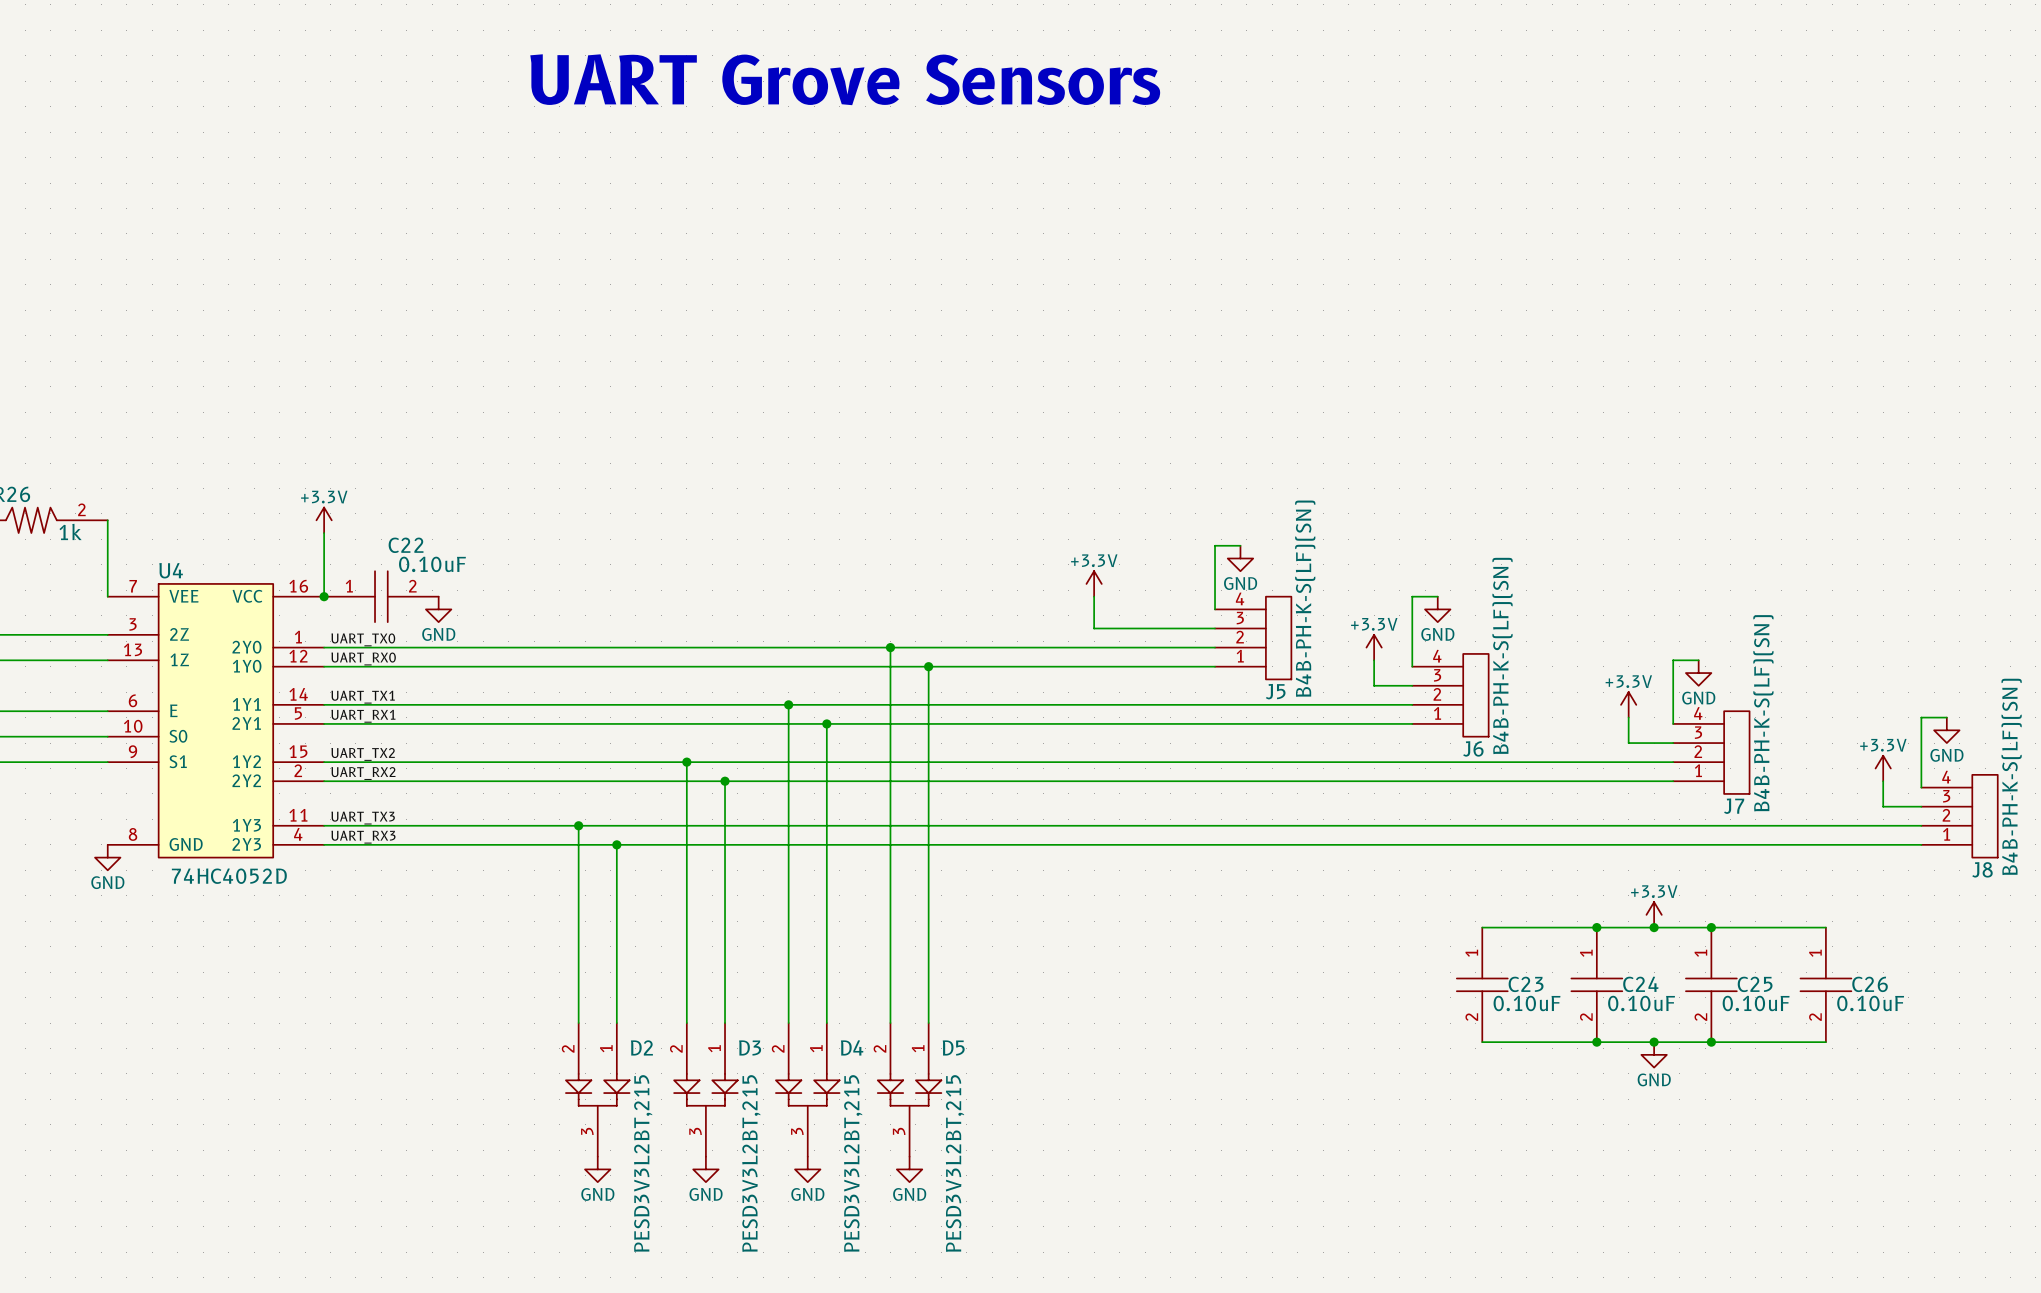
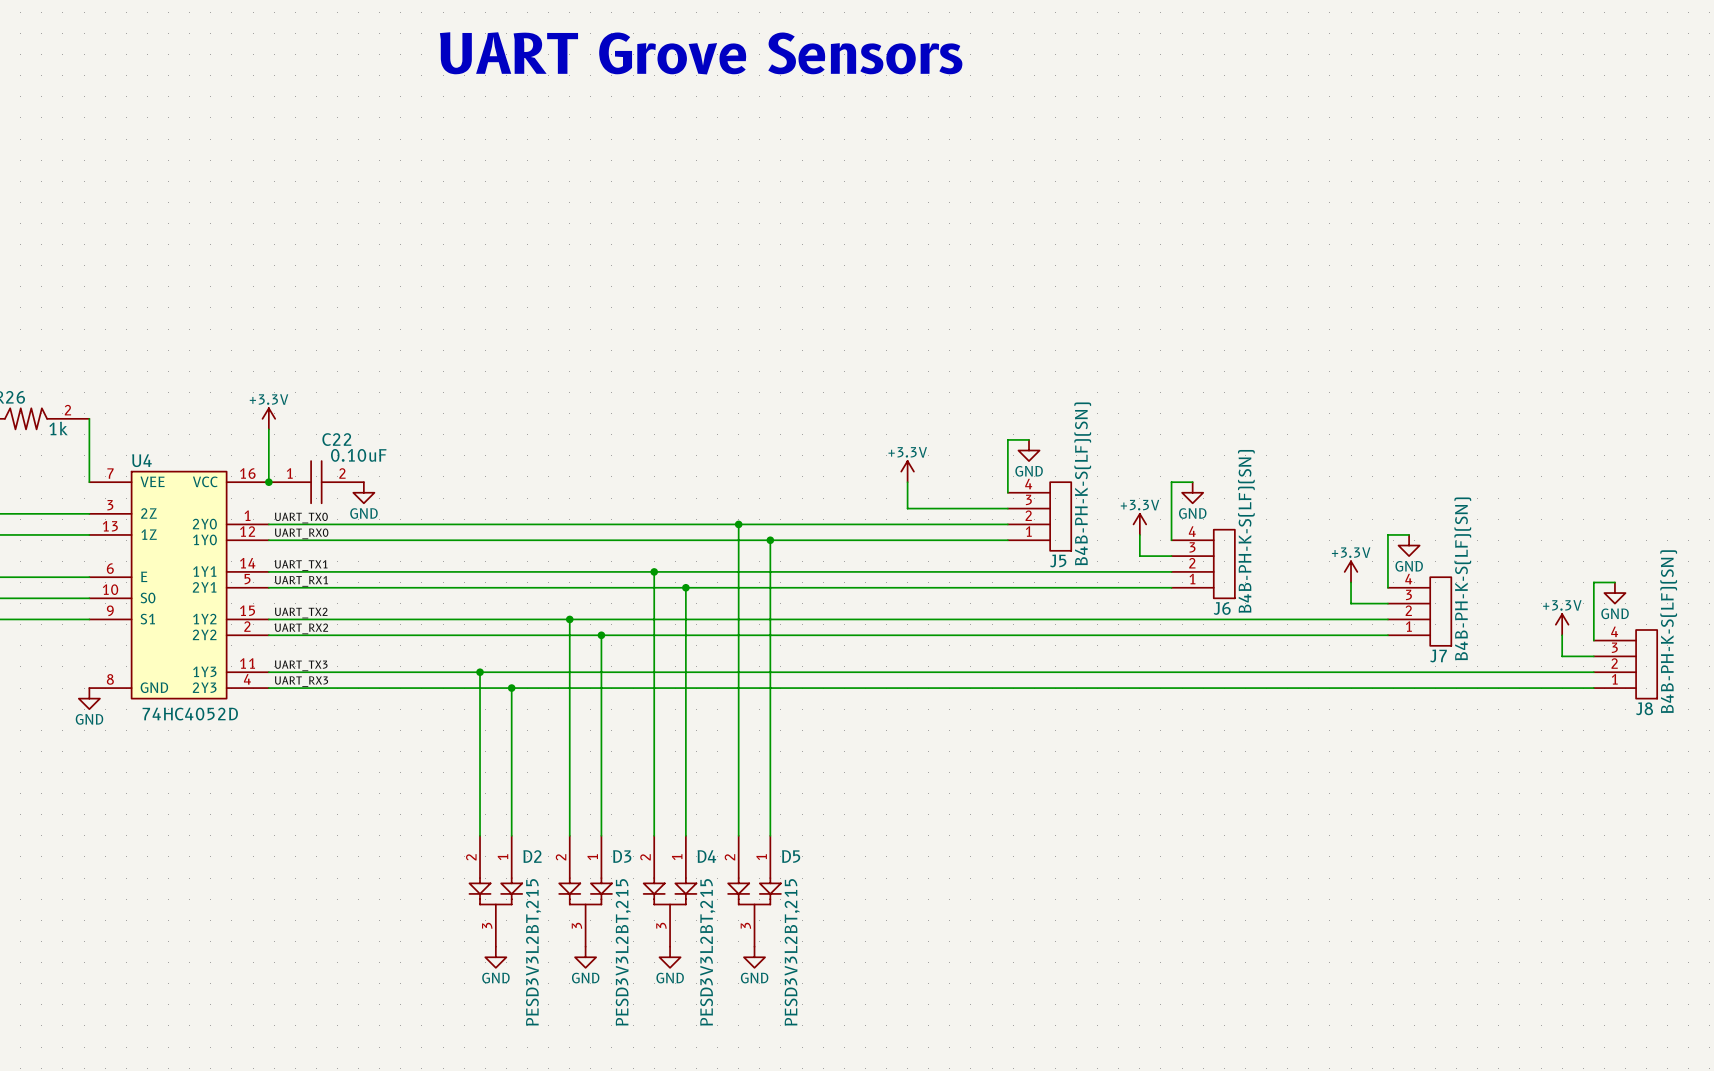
power symbol: +3.3V (1654, 914) -> none
wire: (1482, 927) (1825, 927) -> none
junction: (1596, 927) -> none
junction: (1654, 927) -> none
junction: (1711, 927) -> none
C23: (1482, 984) -> none
C24: (1596, 984) -> none
C25: (1711, 984) -> none
C26: (1825, 984) -> none
wire: (1482, 1042) (1825, 1042) -> none
junction: (1596, 1042) -> none
junction: (1654, 1042) -> none
junction: (1711, 1042) -> none
power symbol: GND (1654, 1054) -> none

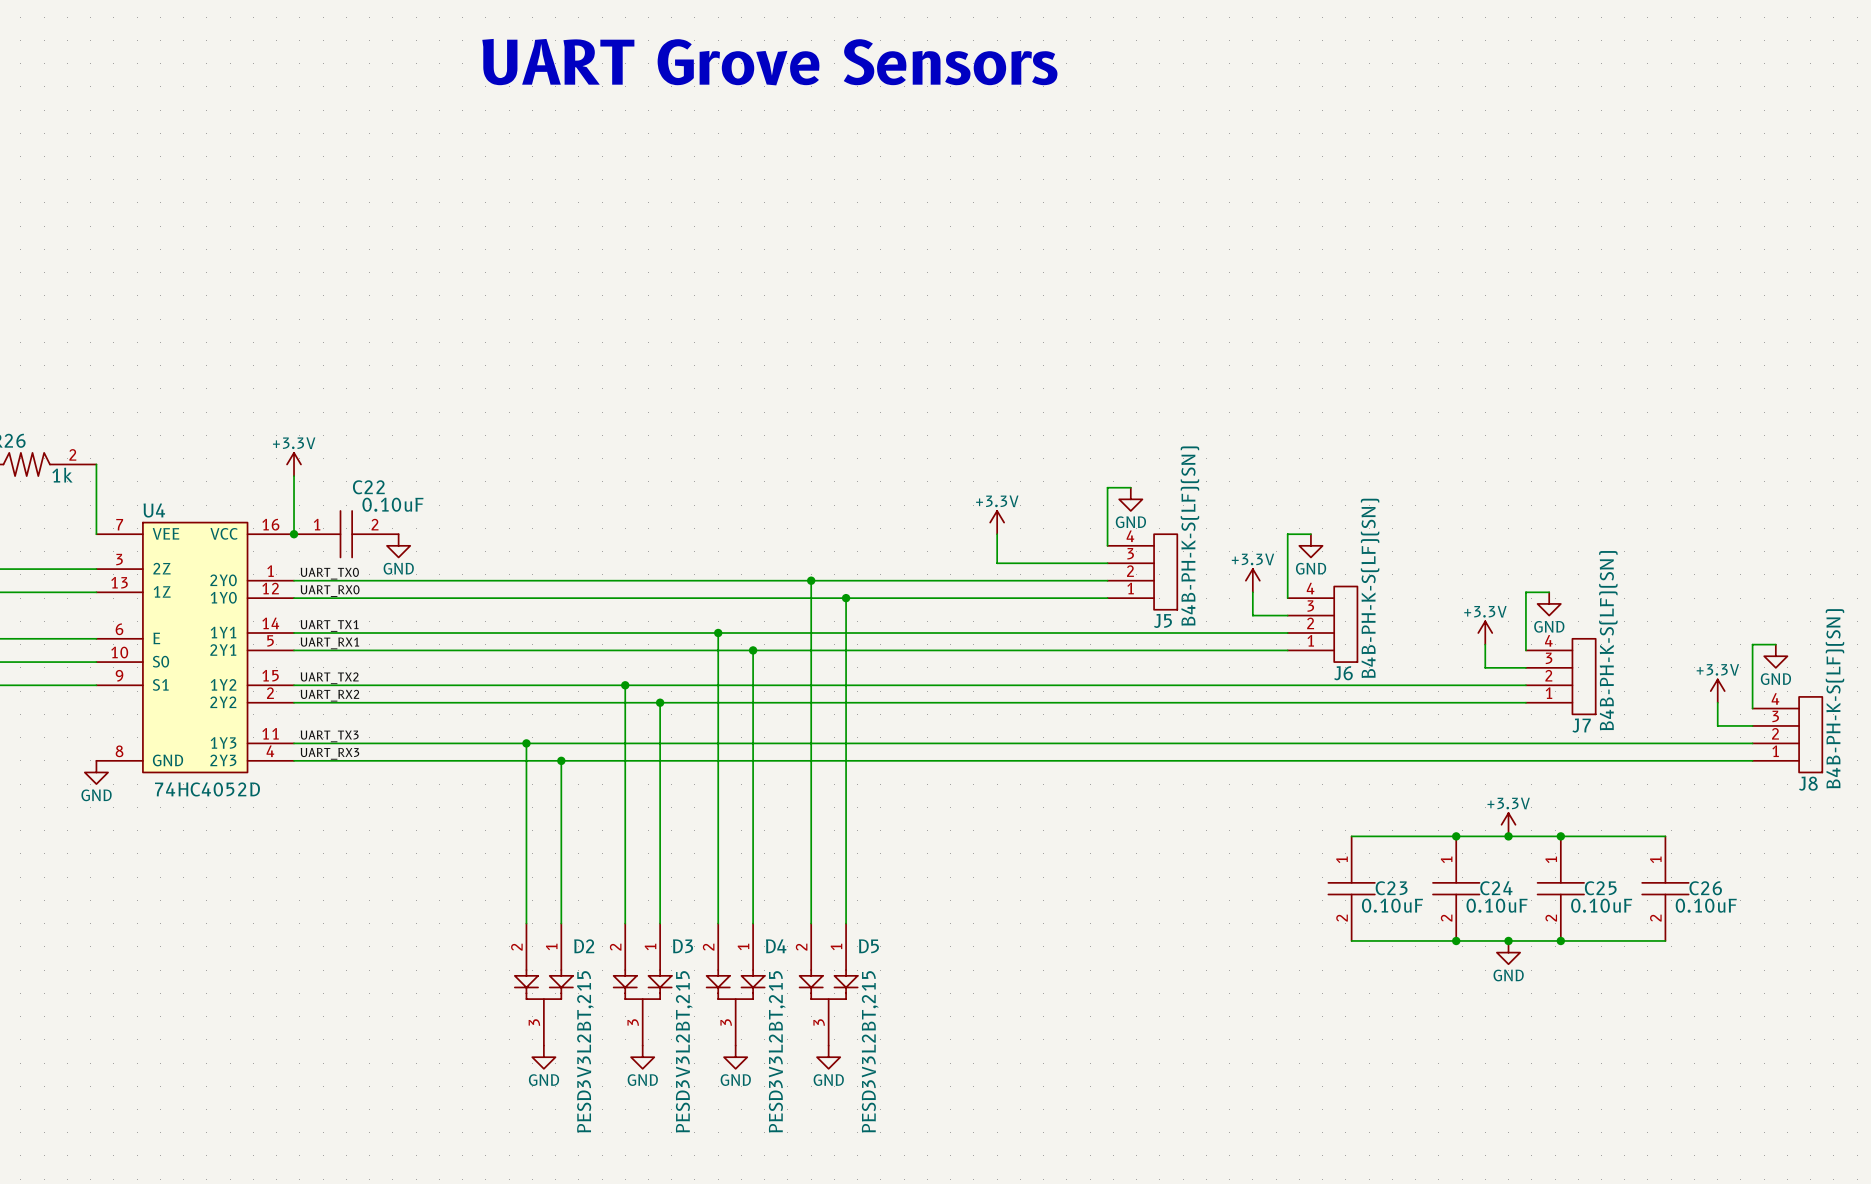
power symbol: none -> +3.3V (1508, 824)
wire: none -> (1351, 836) (1665, 836)
junction: none -> (1456, 836)
junction: none -> (1508, 836)
junction: none -> (1560, 836)
C23: none -> (1351, 888)
C24: none -> (1456, 888)
C25: none -> (1560, 888)
C26: none -> (1665, 888)
wire: none -> (1351, 940) (1665, 940)
junction: none -> (1456, 940)
junction: none -> (1508, 940)
junction: none -> (1560, 940)
power symbol: none -> GND (1508, 952)

